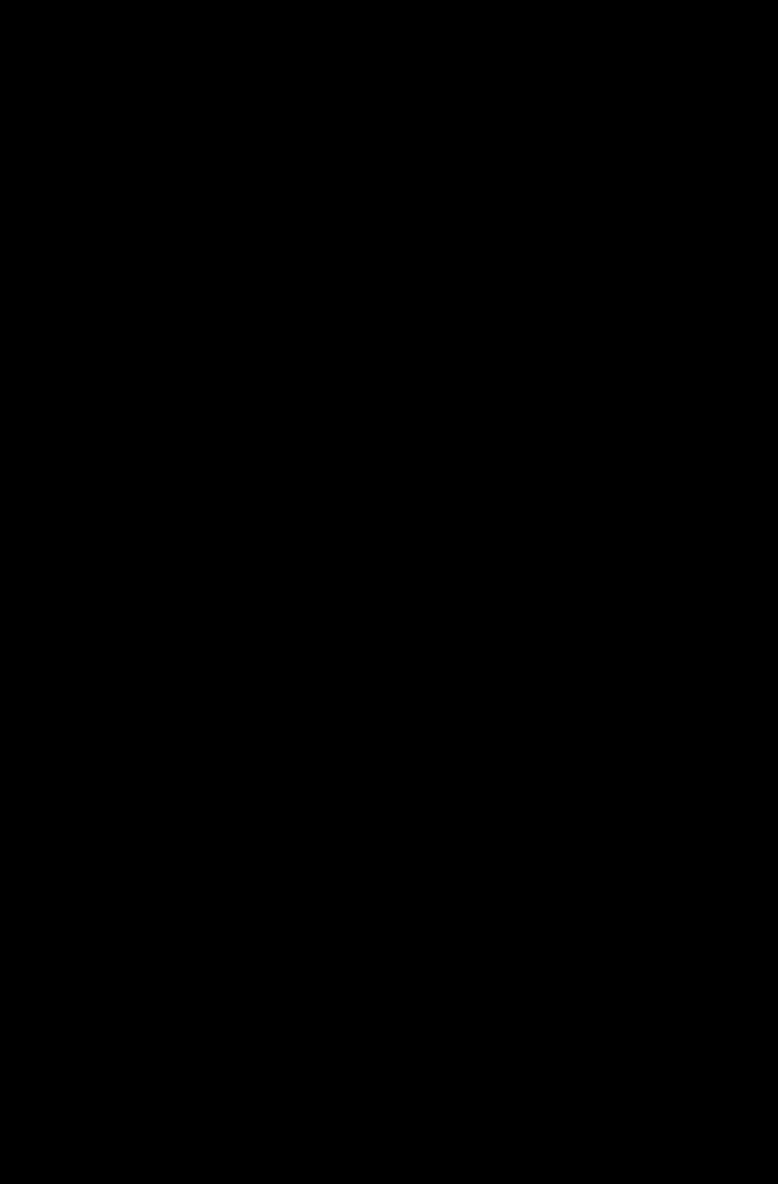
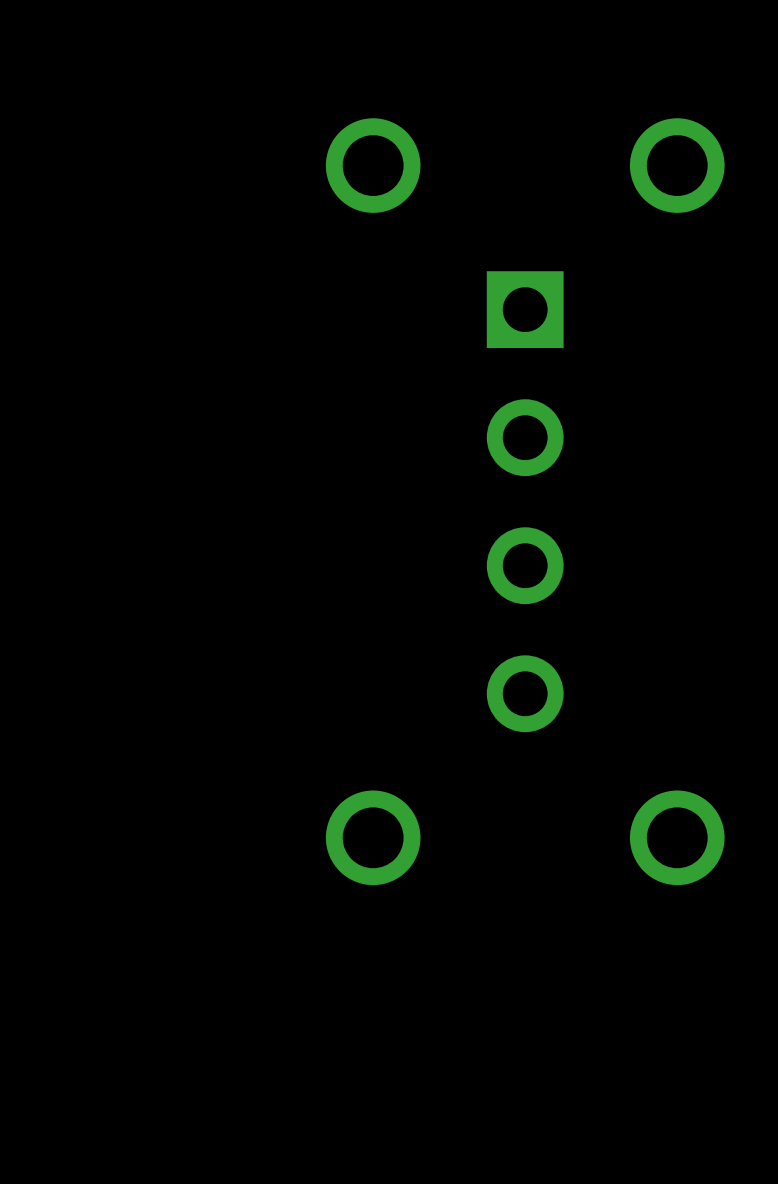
part: none -> (525, 501)

